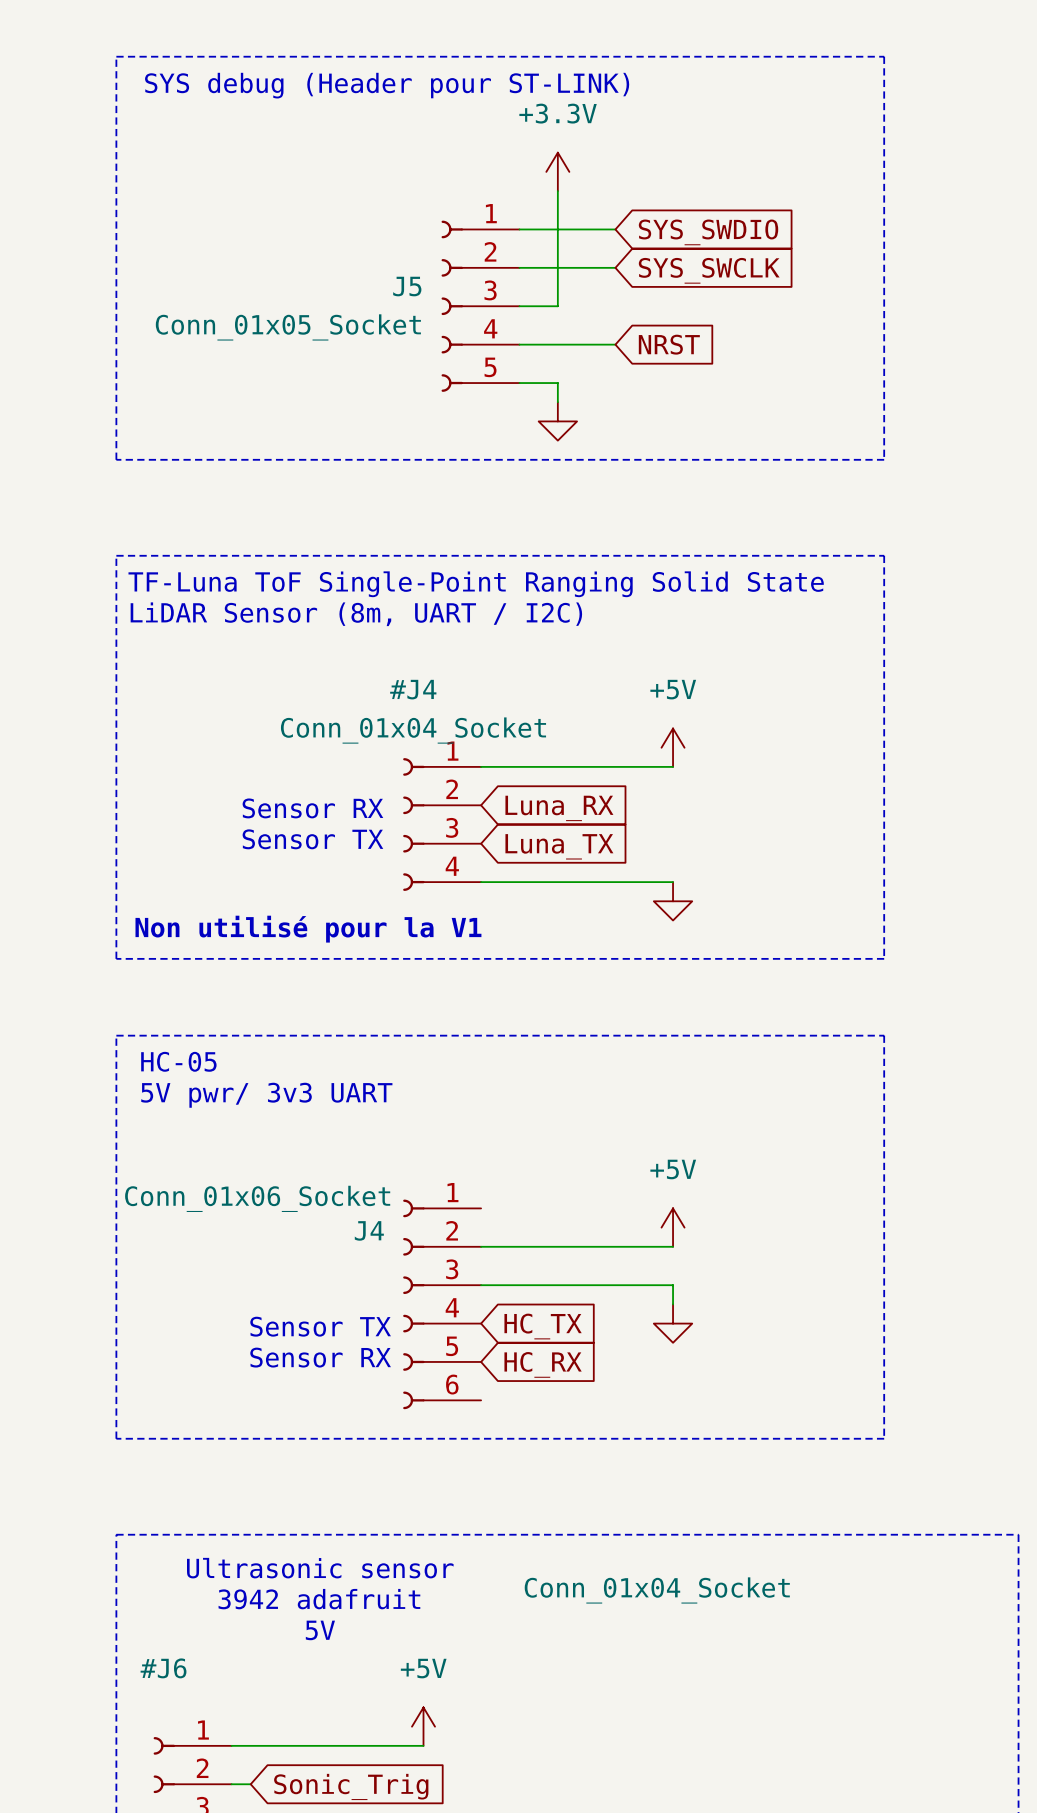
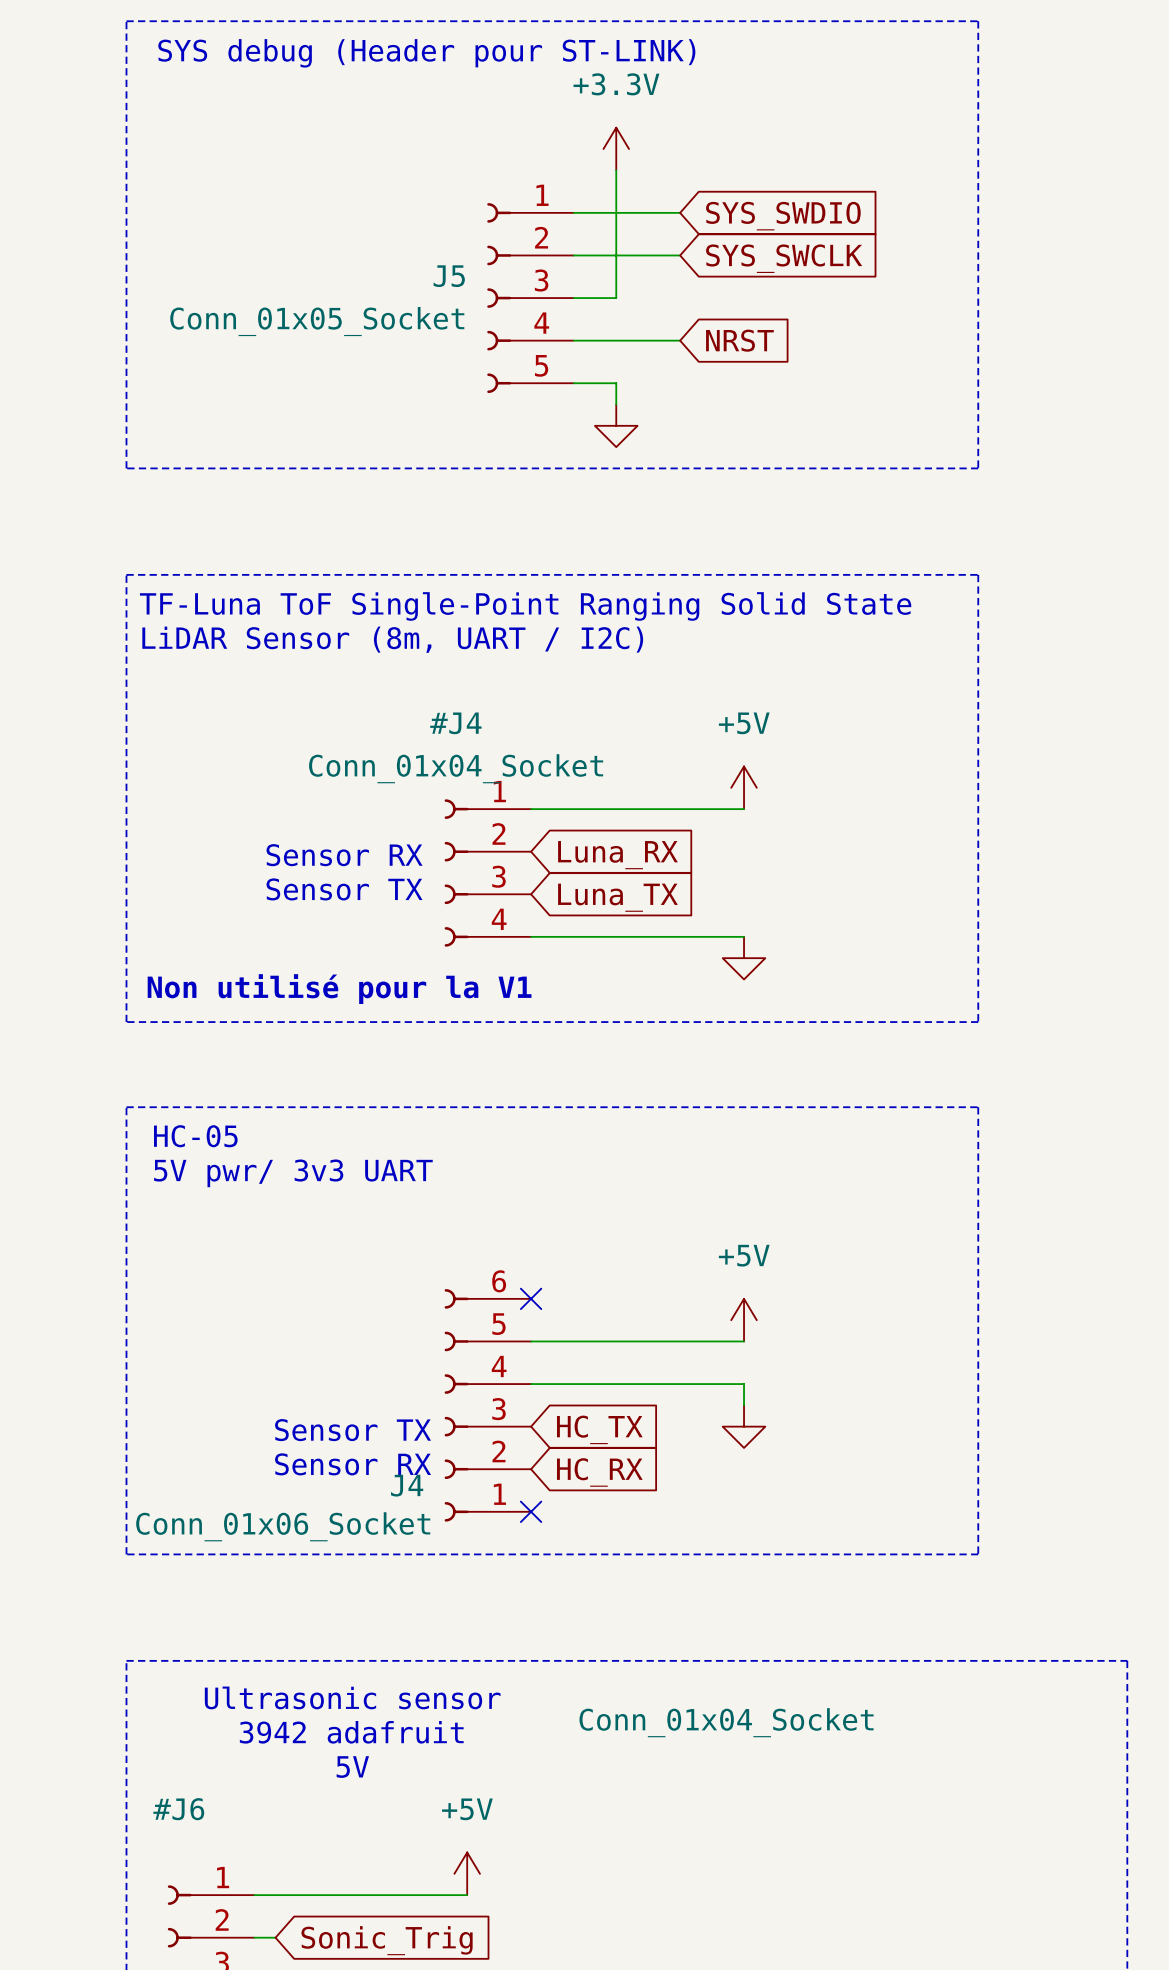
no-connect mark: none -> (531, 1298)
J4 flip: as is (413, 1304) -> up-down (456, 1405)
no-connect mark: none -> (531, 1511)

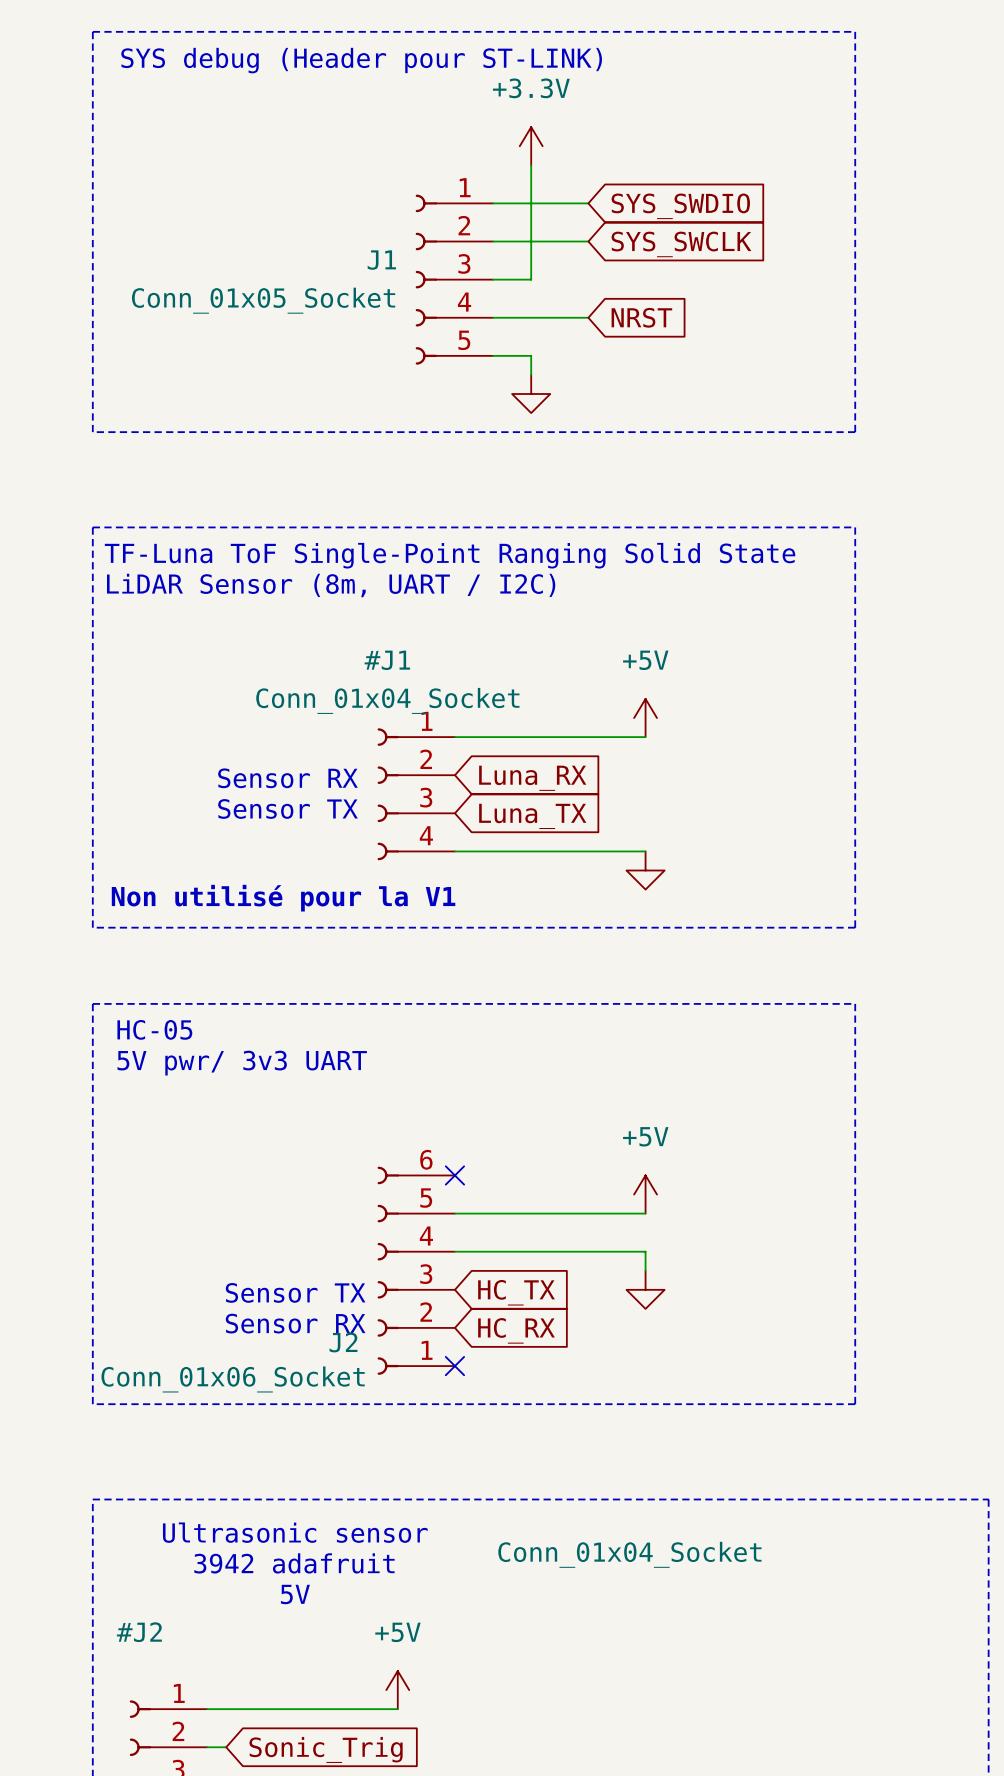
J5 name: J5 (449, 276) -> J1 (381, 260)
#J4 name: #J4 (455, 723) -> #J1 (387, 660)
J4 name: J4 (407, 1485) -> J2 (343, 1342)
#J6 name: #J6 (178, 1809) -> #J2 (139, 1632)

